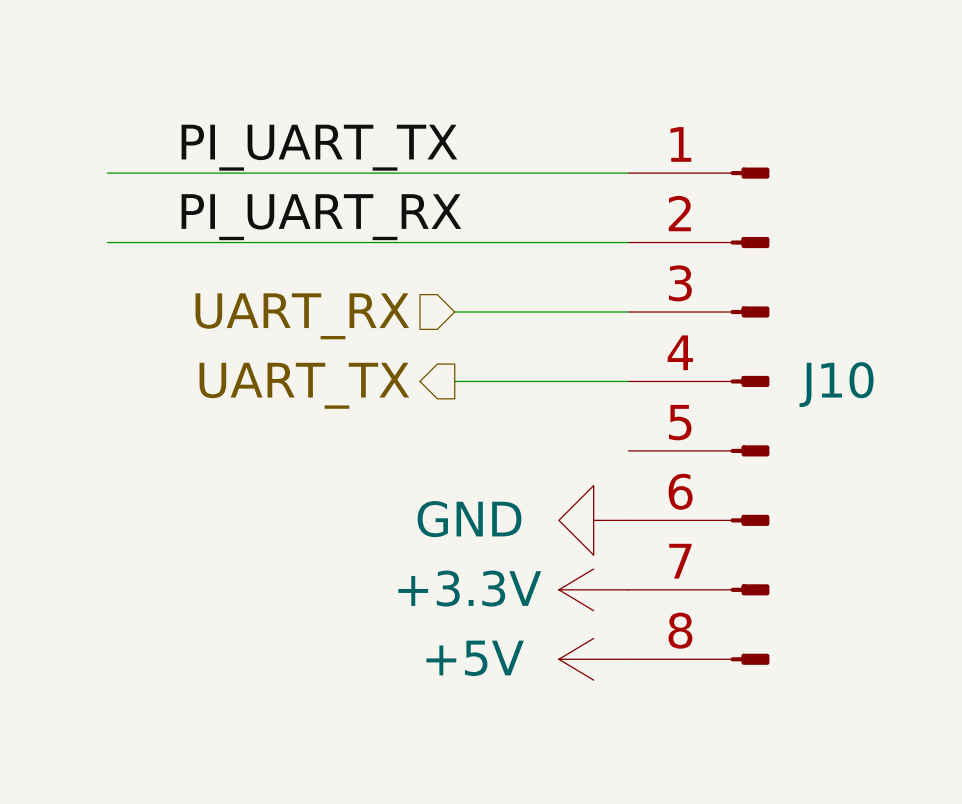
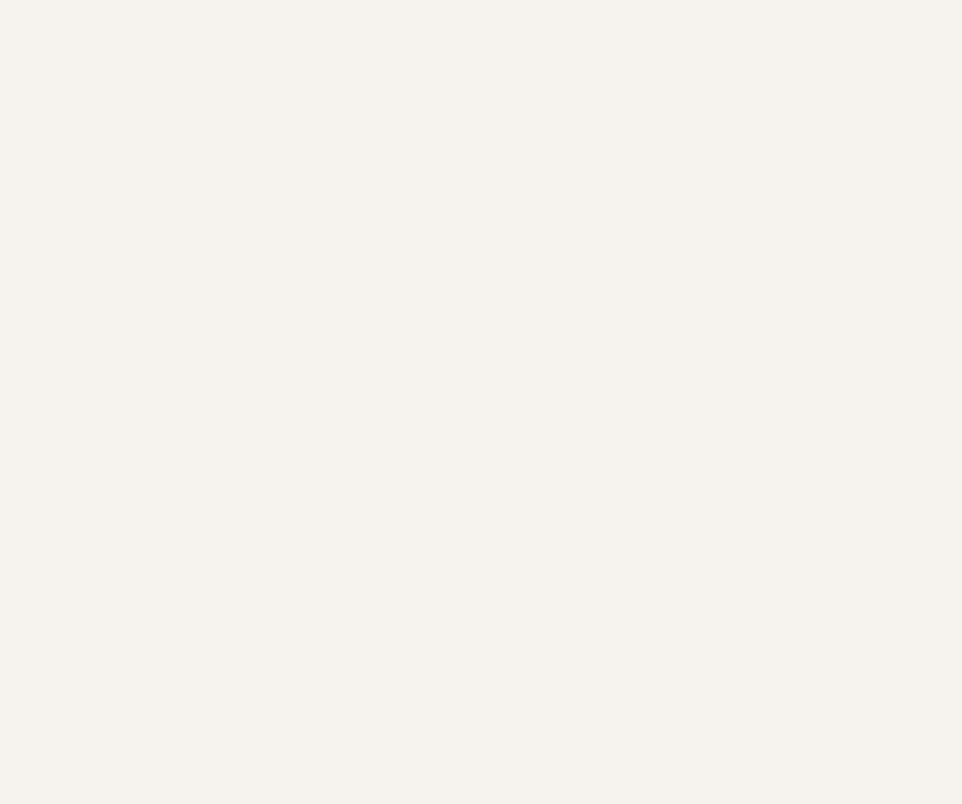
label: PI_UART_TX (319, 147) -> none
wire: (107, 173) (628, 173) -> none
label: PI_UART_RX (321, 217) -> none
wire: (107, 242) (628, 242) -> none
wire: (454, 312) (628, 312) -> none
hierarchical label: UART_RX (302, 316) -> none
wire: (454, 381) (628, 381) -> none
hierarchical label: UART_TX (304, 385) -> none
J10: (698, 416) -> none
power symbol: GND (593, 520) -> none
power symbol: +3.3V (593, 589) -> none
power symbol: +5V (593, 659) -> none

